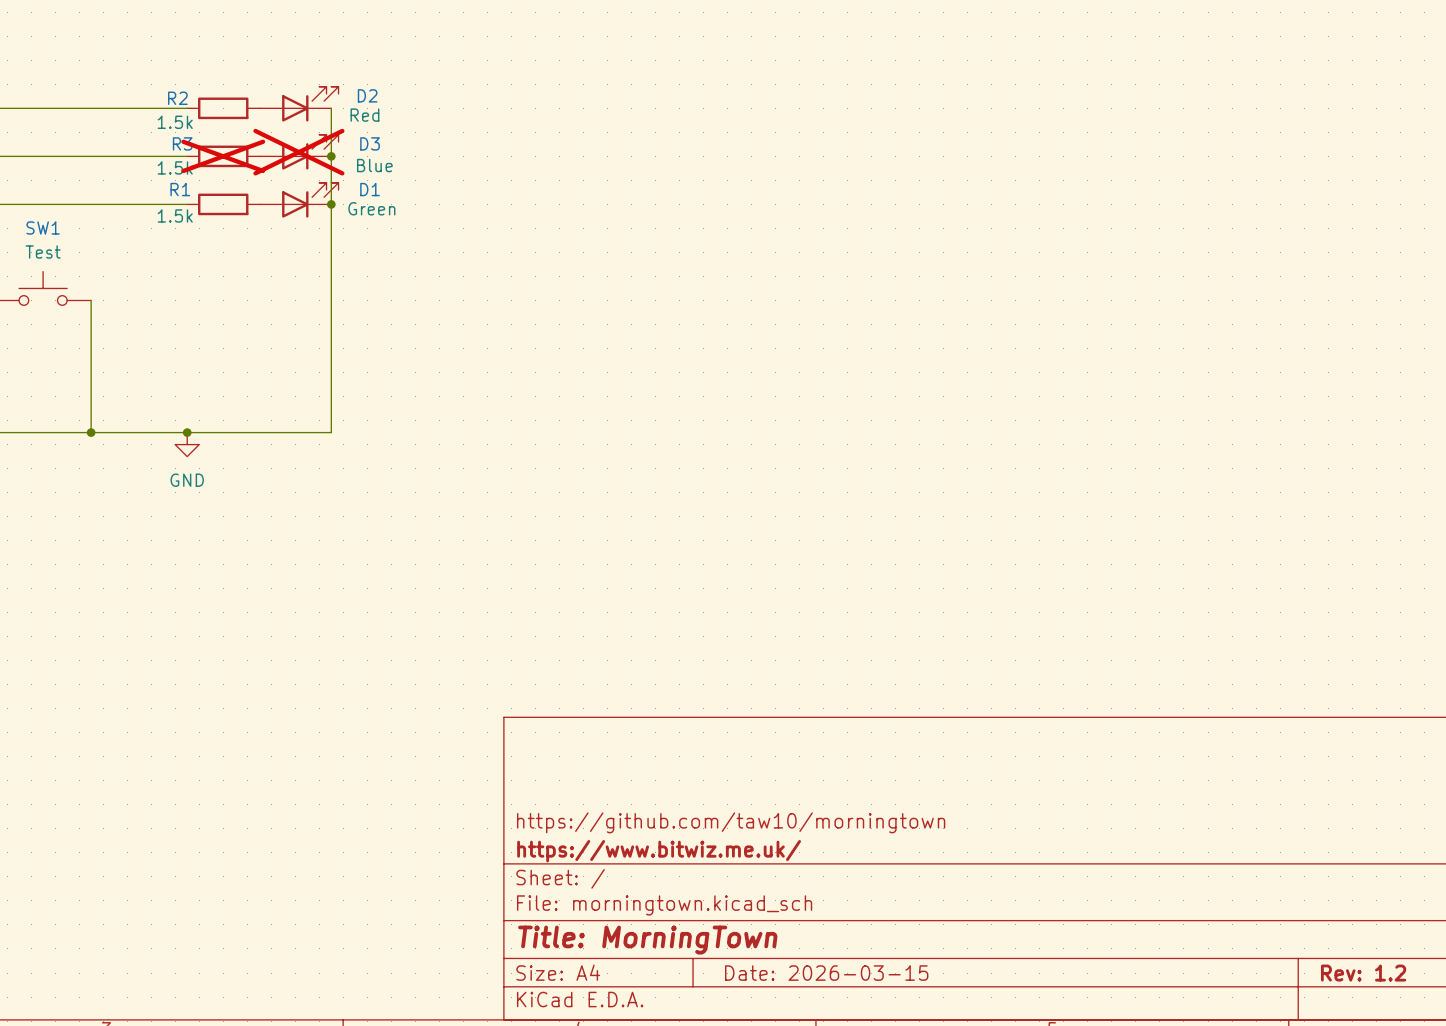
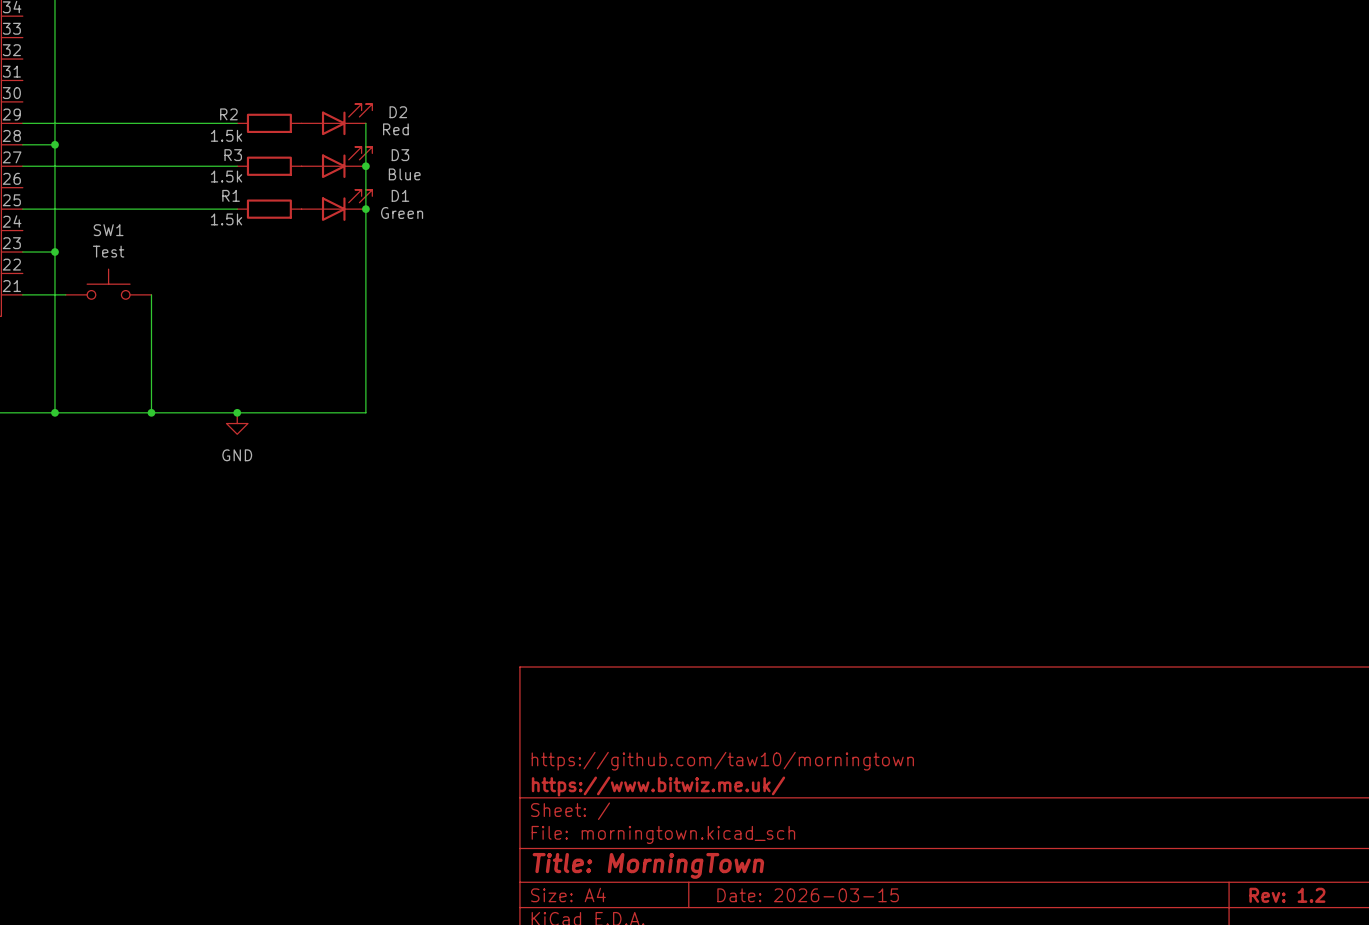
D3 do-not-place cross: (298, 152) -> none
R3 do-not-place cross: (223, 156) -> none

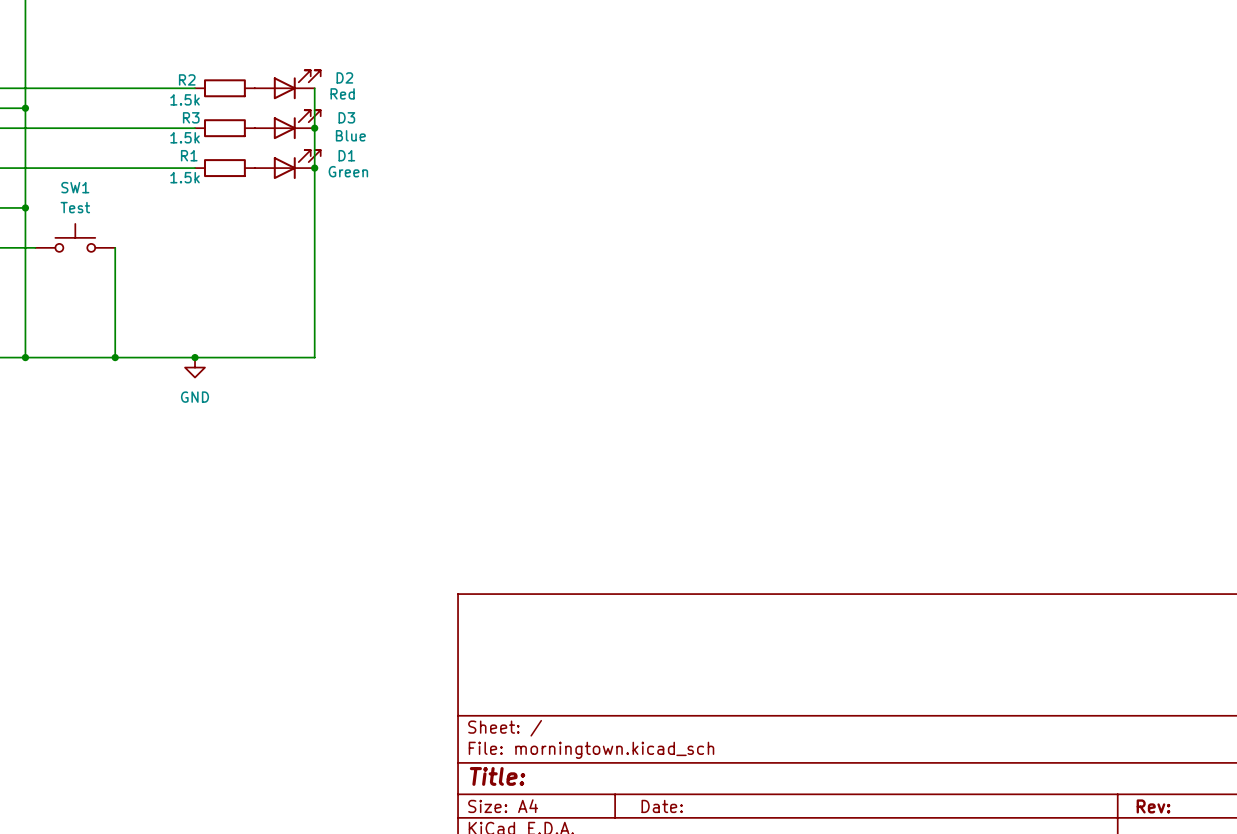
title block: https://github.com/taw10/morningtown (722, 761) -> none
title block: https://www.bitwiz.me.uk/ (658, 786) -> none
title block: Title: MorningTown (648, 865) -> Title: (497, 776)
title block: Date: 2026-03-15 (808, 895) -> Date: (662, 806)
title block: Rev: 1.2 (1287, 895) -> Rev: (1153, 806)

